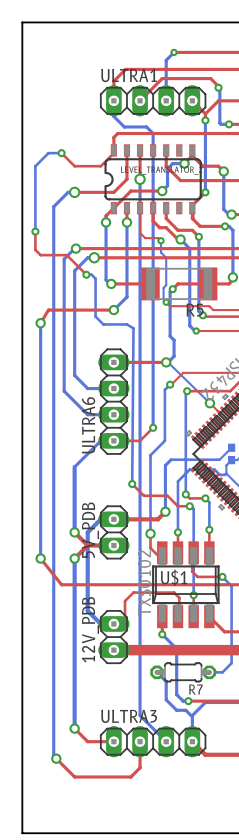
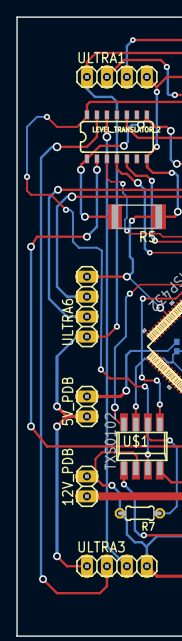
bottom track: (113, 519) (100, 519) (87, 532) (87, 610) (100, 623) -> none
top track: none -> (86, 476) (93, 476) (102, 485) (111, 485)
bottom track: none -> (111, 485) (119, 493) (119, 513)
via: none -> (111, 485)

